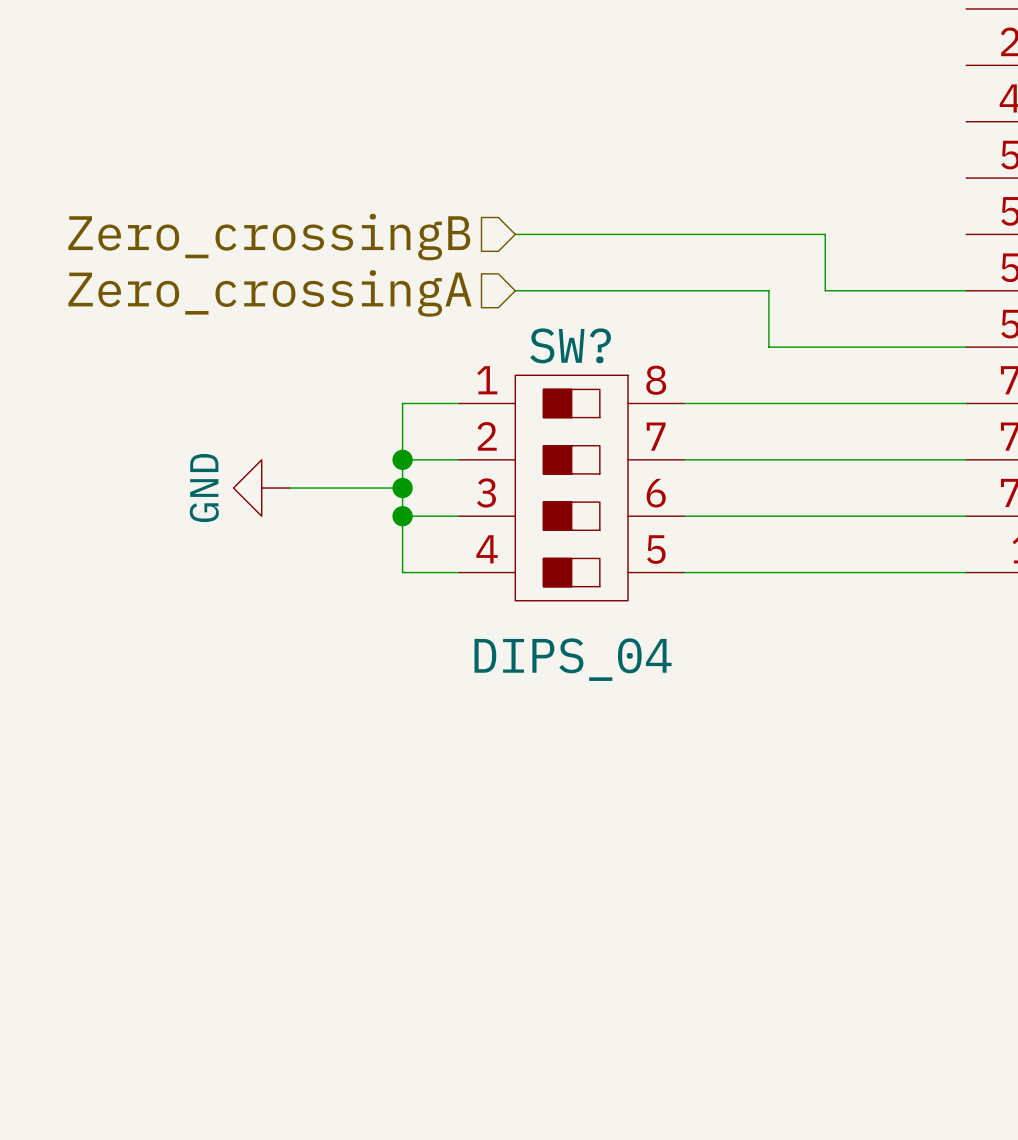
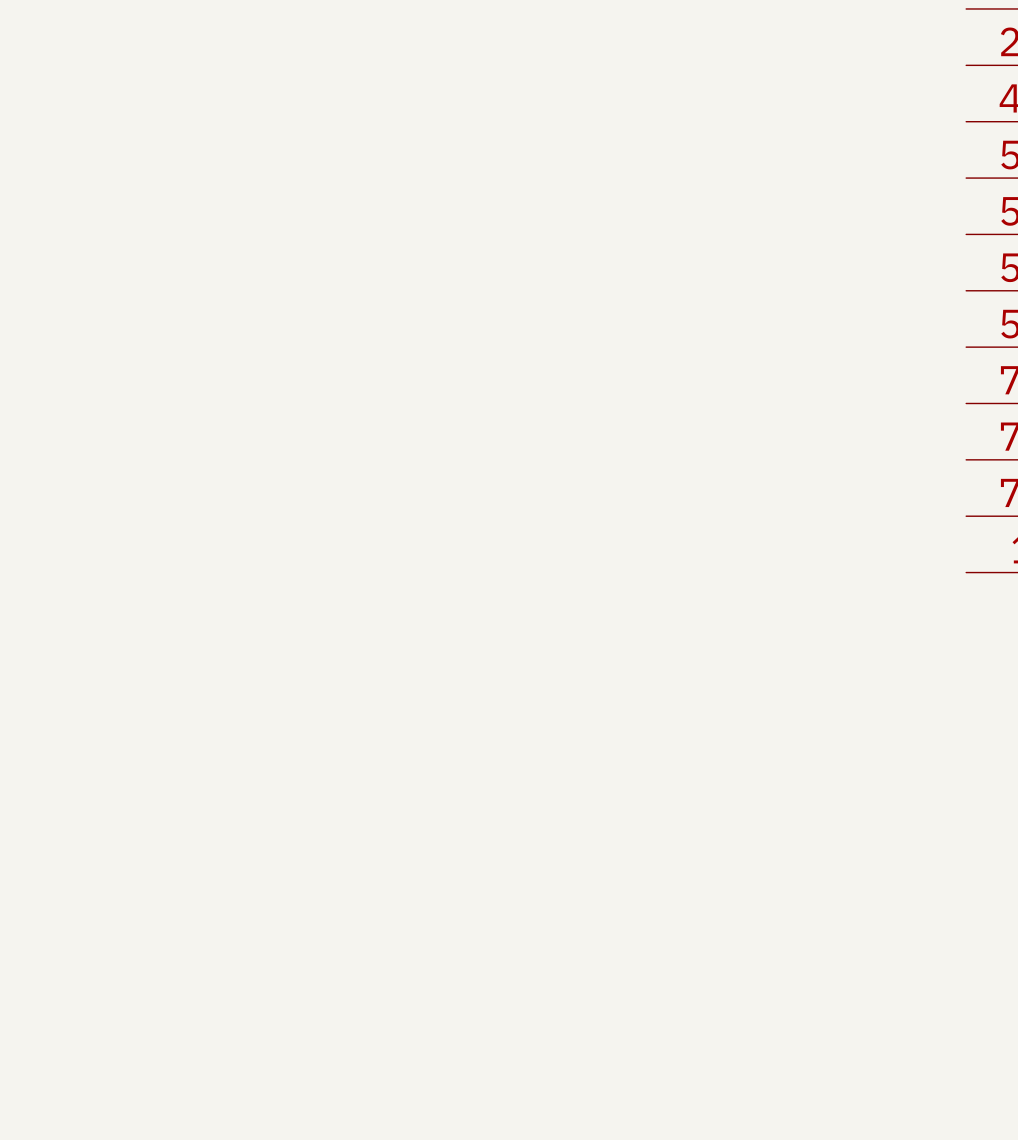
wire: (515, 234) (825, 234) (825, 290) (966, 290) -> none
hierarchical label: Zero_crossingB (269, 237) -> none
wire: (515, 290) (768, 290) (768, 347) (966, 347) -> none
hierarchical label: Zero_crossingA (270, 293) -> none
wire: (458, 403) (402, 403) (402, 572) (458, 572) -> none
wire: (684, 403) (966, 403) -> none
wire: (402, 459) (458, 459) -> none
junction: (402, 459) -> none
wire: (684, 459) (966, 459) -> none
power symbol: GND (261, 488) -> none
wire: (289, 488) (402, 488) -> none
junction: (402, 488) -> none
SW?: DIPS_04 (571, 488) -> none
wire: (402, 516) (458, 516) -> none
junction: (402, 516) -> none
wire: (684, 516) (966, 516) -> none
wire: (684, 572) (966, 572) -> none

